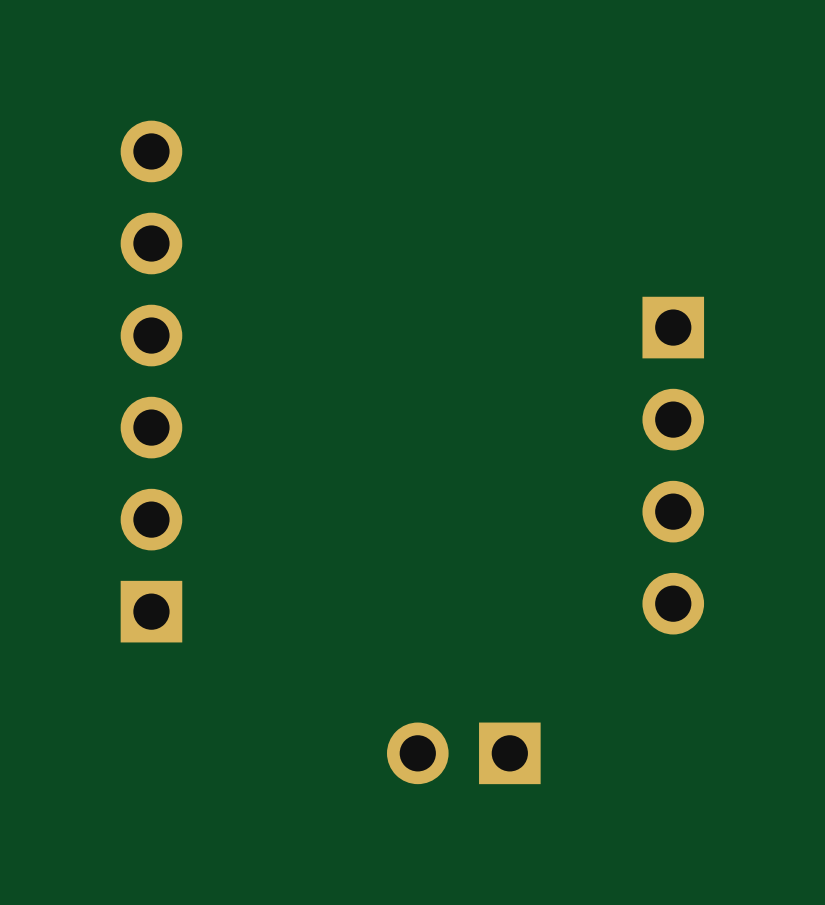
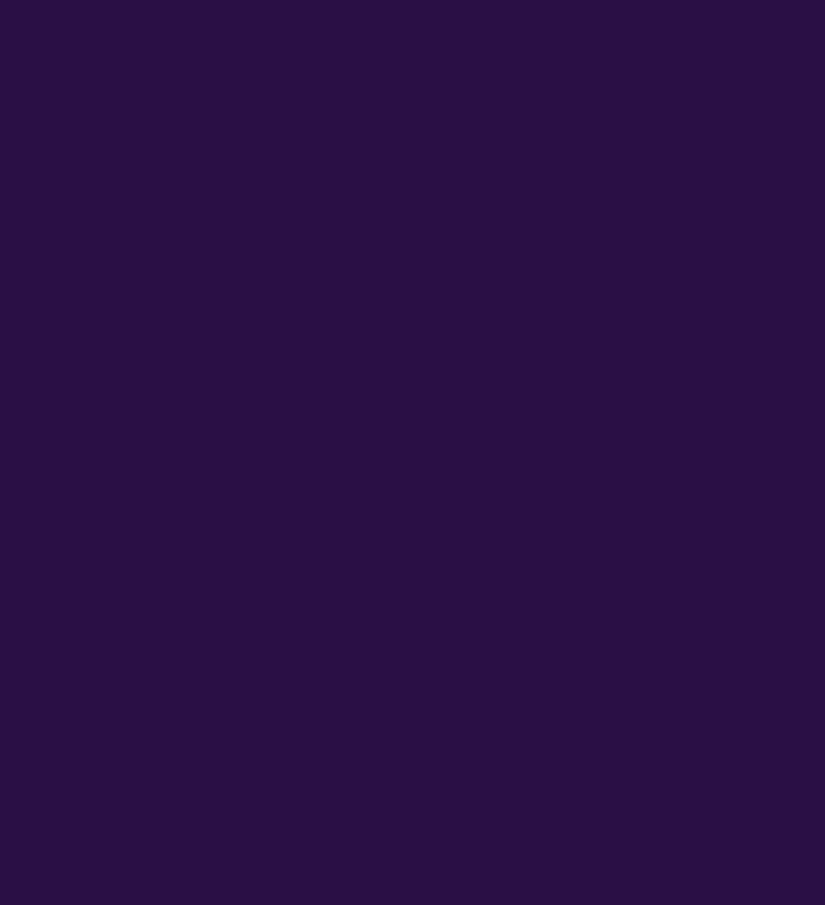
part: (151, 381) -> none
part: (673, 465) -> none
part: (463, 753) -> none

